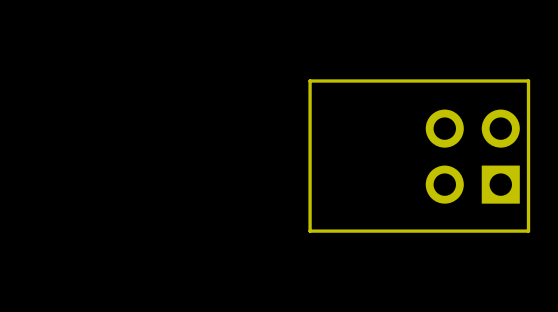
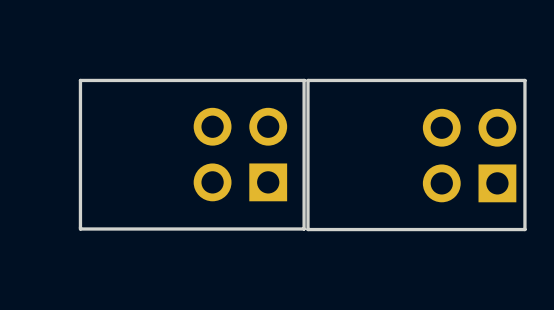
board edge: none -> (304, 80) (80, 80) (80, 228) (304, 228) (304, 80)
part: none -> (240, 154)

